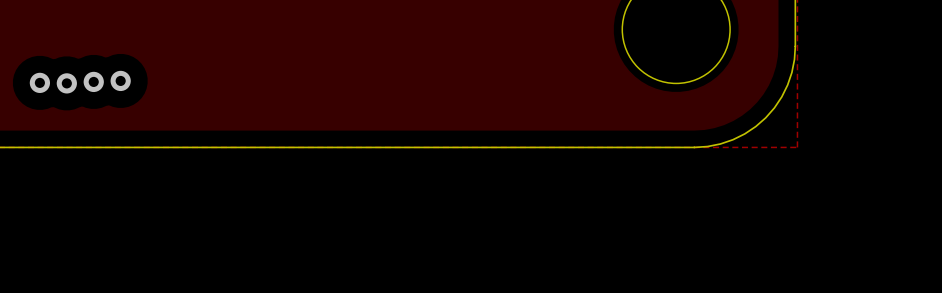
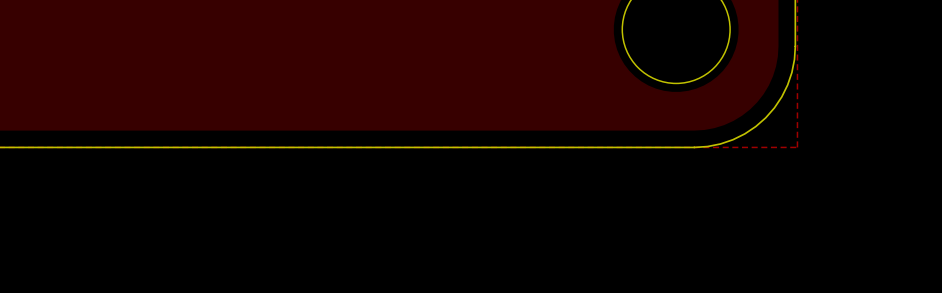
via: (120, 80) -> none
via: (93, 81) -> none
via: (39, 82) -> none
via: (66, 83) -> none

